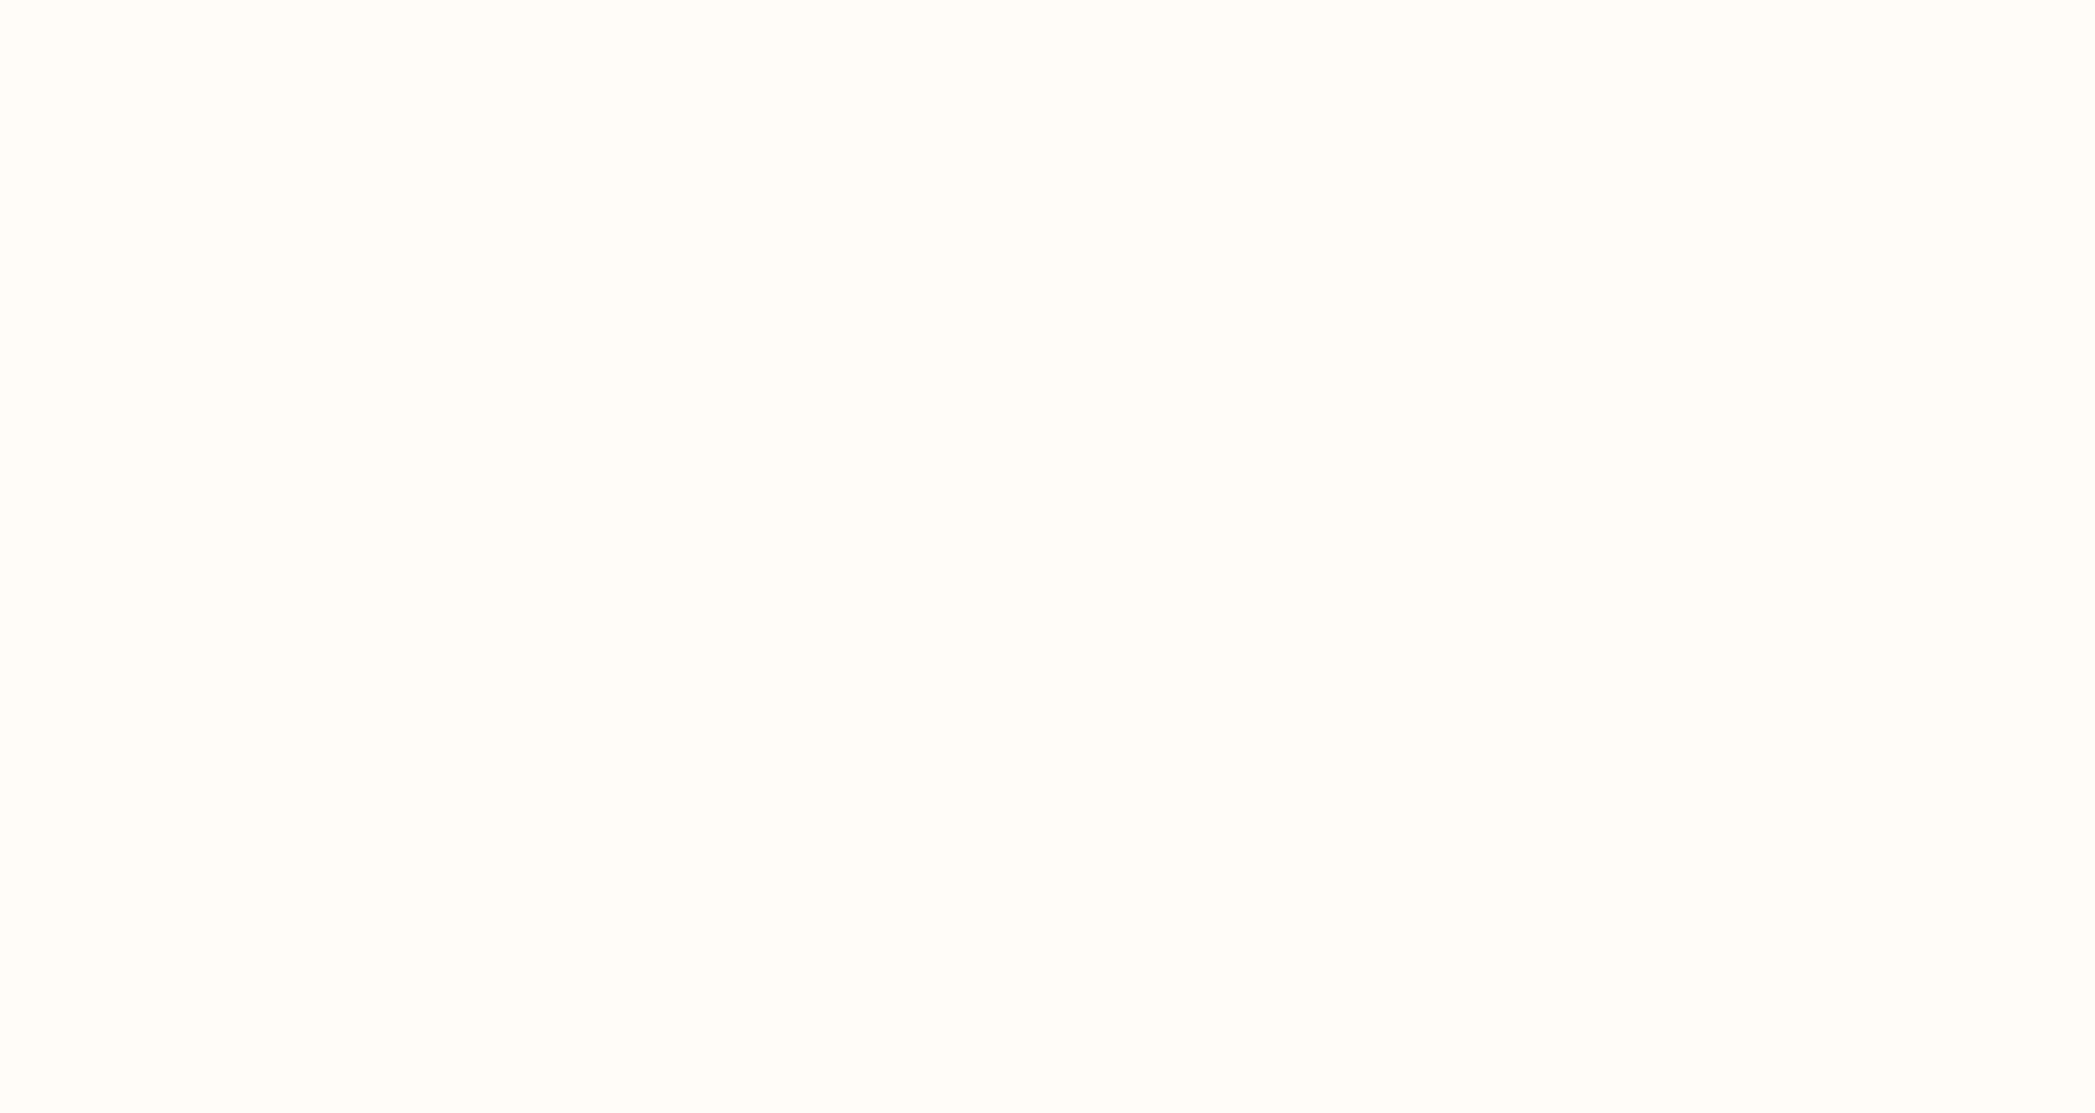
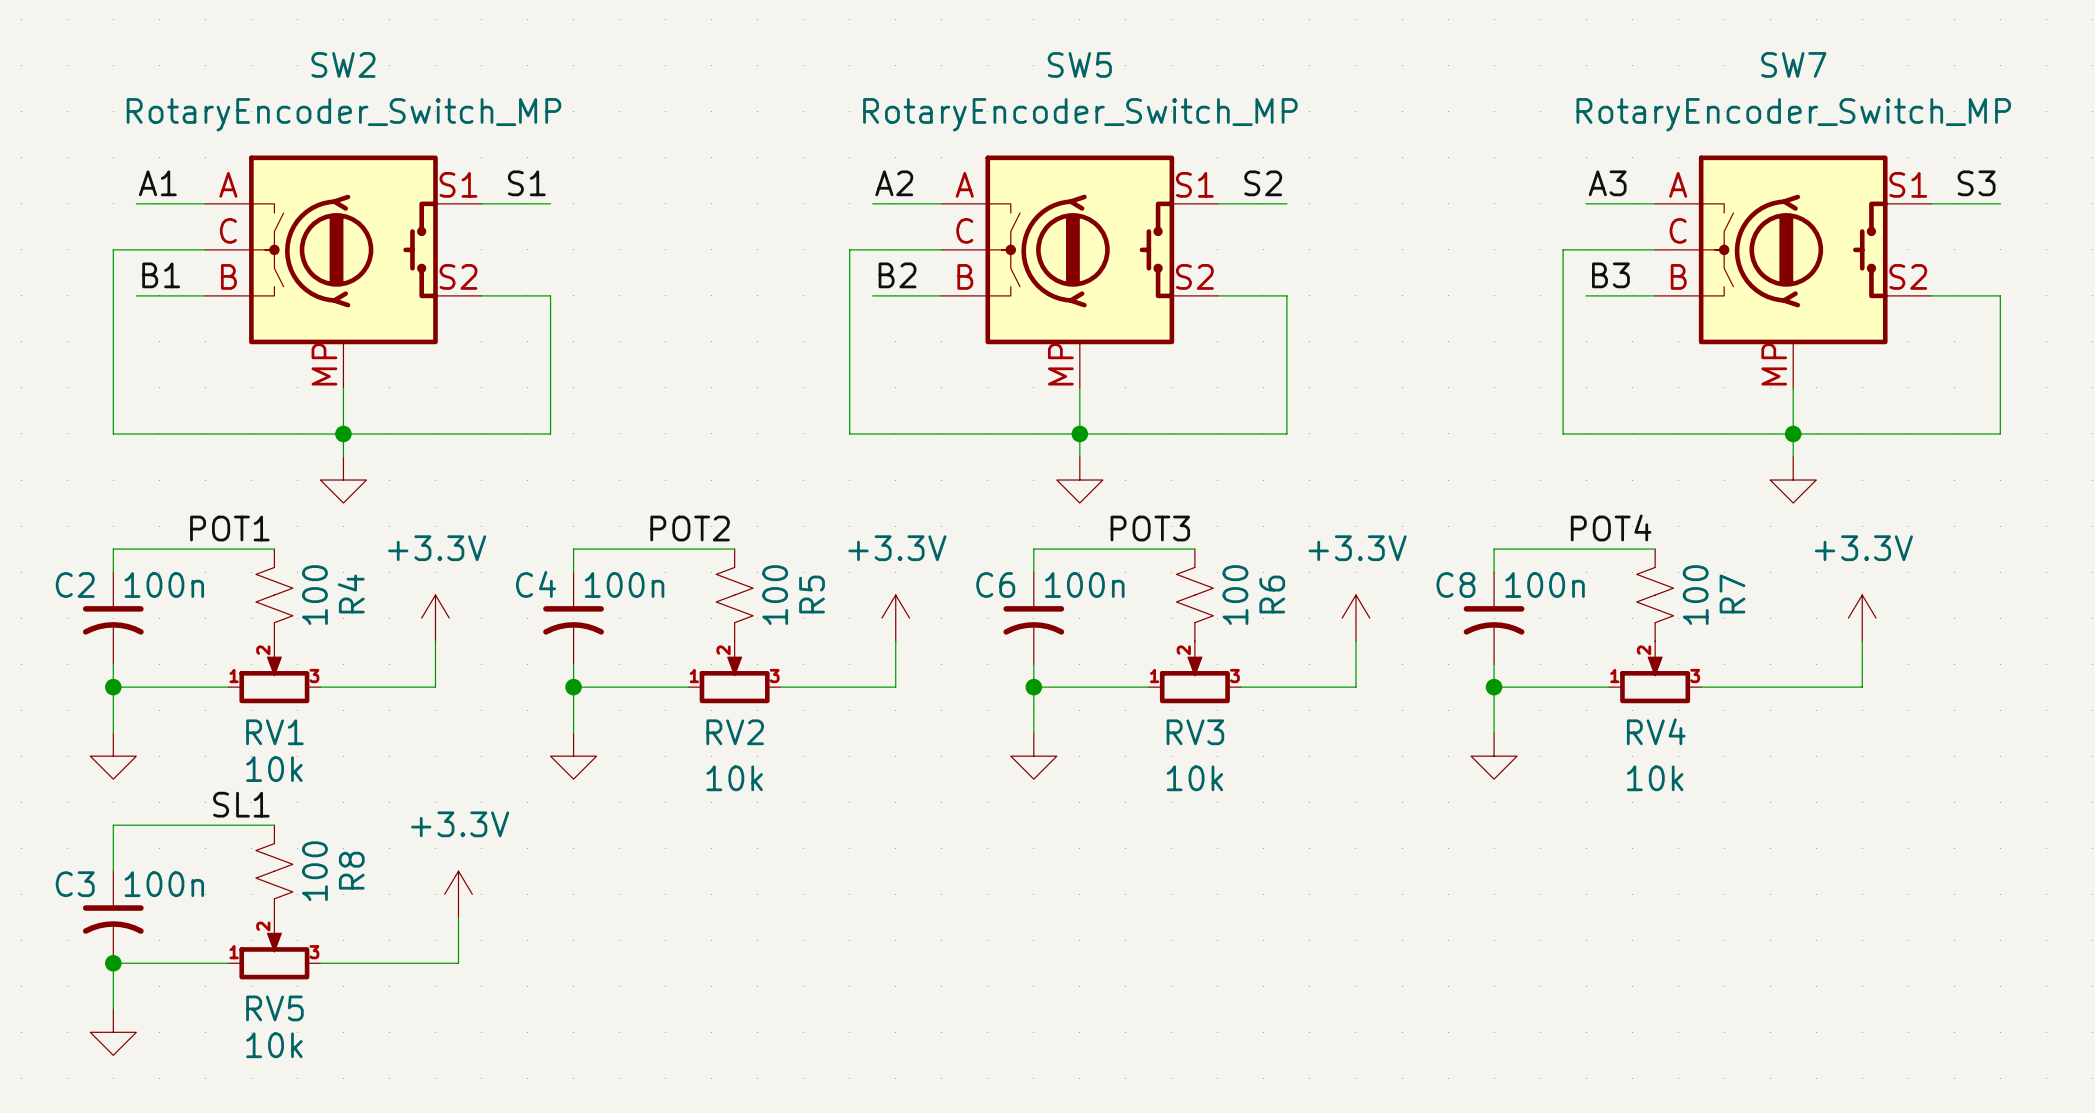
label: none -> A1 (157, 183)
label: none -> S1 (526, 183)
label: none -> A2 (894, 183)
label: none -> S2 (1263, 183)
label: none -> A3 (1607, 183)
label: none -> S3 (1976, 183)
wire: none -> (136, 203) (205, 203)
wire: none -> (481, 203) (550, 203)
wire: none -> (872, 203) (941, 203)
wire: none -> (1217, 203) (1286, 203)
wire: none -> (1586, 203) (1655, 203)
wire: none -> (1931, 203) (2000, 203)
wire: none -> (205, 249) (113, 249) (113, 433) (550, 433) (550, 295) (481, 295)
wire: none -> (941, 249) (849, 249) (849, 433) (1286, 433) (1286, 295) (1217, 295)
wire: none -> (1655, 249) (1563, 249) (1563, 433) (2000, 433) (2000, 295) (1931, 295)
SW2: none -> RotaryEncoder_Switch_MP (343, 271)
SW5: none -> RotaryEncoder_Switch_MP (1079, 271)
SW7: none -> RotaryEncoder_Switch_MP (1793, 271)
label: none -> B1 (161, 275)
label: none -> B2 (897, 275)
label: none -> B3 (1610, 275)
wire: none -> (136, 295) (205, 295)
wire: none -> (872, 295) (941, 295)
wire: none -> (1586, 295) (1655, 295)
wire: none -> (343, 387) (343, 457)
wire: none -> (1079, 387) (1079, 457)
wire: none -> (1793, 387) (1793, 457)
junction: none -> (343, 433)
junction: none -> (1079, 433)
junction: none -> (1793, 433)
power symbol: none -> (343, 480)
power symbol: none -> (1079, 480)
power symbol: none -> (1793, 480)
label: none -> POT4 (1611, 527)
label: none -> POT1 (229, 528)
label: none -> POT2 (690, 528)
label: none -> POT3 (1150, 528)
wire: none -> (274, 549) (113, 549) (113, 572)
wire: none -> (734, 549) (573, 549) (573, 572)
wire: none -> (1194, 549) (1033, 549) (1033, 572)
wire: none -> (1655, 549) (1494, 549) (1494, 572)
R4: none -> 100 (274, 595)
R5: none -> 100 (734, 595)
R6: none -> 100 (1194, 595)
R7: none -> 100 (1655, 595)
C2: none -> 100n (113, 618)
power symbol: none -> +3.3V (435, 618)
C4: none -> 100n (573, 618)
power symbol: none -> +3.3V (895, 618)
C6: none -> 100n (1033, 618)
power symbol: none -> +3.3V (1355, 618)
C8: none -> 100n (1494, 618)
power symbol: none -> +3.3V (1862, 618)
wire: none -> (435, 641) (435, 687) (320, 687)
wire: none -> (895, 641) (895, 687) (780, 687)
wire: none -> (1355, 641) (1355, 687) (1240, 687)
wire: none -> (1862, 641) (1862, 687) (1701, 687)
wire: none -> (113, 664) (113, 733)
wire: none -> (573, 664) (573, 733)
wire: none -> (1033, 664) (1033, 733)
wire: none -> (1494, 664) (1494, 733)
RV1: none -> 10k (274, 672)
RV2: none -> 10k (734, 672)
RV3: none -> 10k (1194, 672)
RV4: none -> 10k (1655, 672)
wire: none -> (113, 687) (228, 687)
junction: none -> (113, 687)
wire: none -> (573, 687) (688, 687)
junction: none -> (573, 687)
wire: none -> (1033, 687) (1148, 687)
junction: none -> (1033, 687)
wire: none -> (1494, 687) (1609, 687)
junction: none -> (1494, 687)
power symbol: none -> (113, 756)
power symbol: none -> (573, 756)
power symbol: none -> (1033, 756)
power symbol: none -> (1494, 756)
label: none -> SL1 (241, 804)
wire: none -> (274, 825) (113, 825) (113, 871)
R8: none -> 100 (274, 871)
power symbol: none -> +3.3V (458, 894)
C3: none -> 100n (113, 917)
wire: none -> (458, 917) (458, 963) (320, 963)
RV5: none -> 10k (274, 948)
junction: none -> (113, 963)
wire: none -> (228, 963) (113, 963) (113, 1009)
power symbol: none -> (113, 1032)

